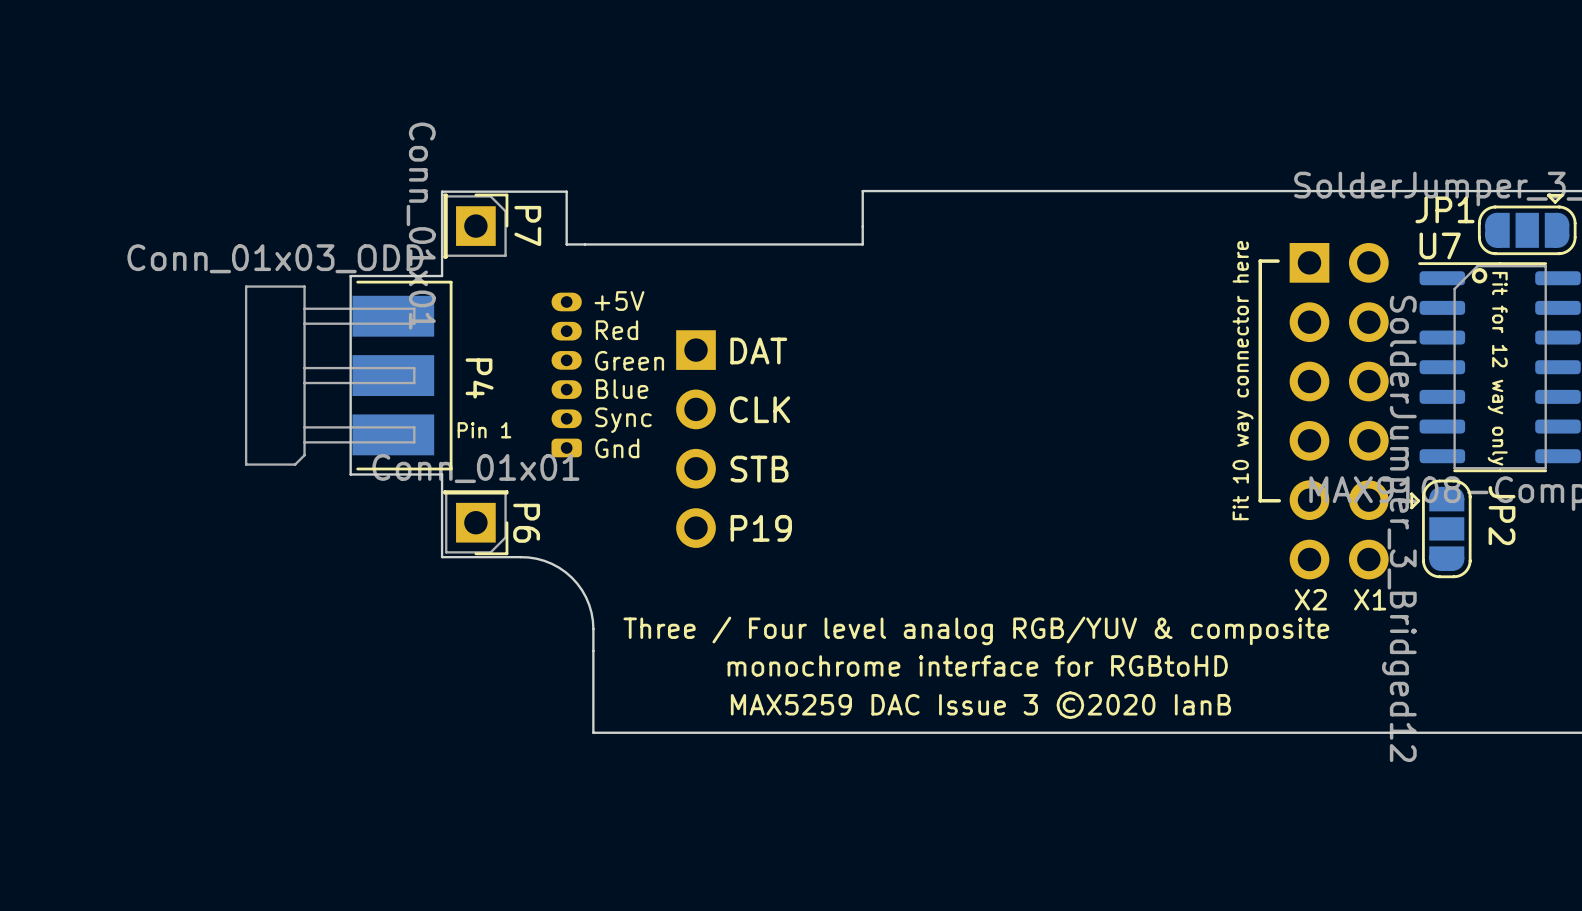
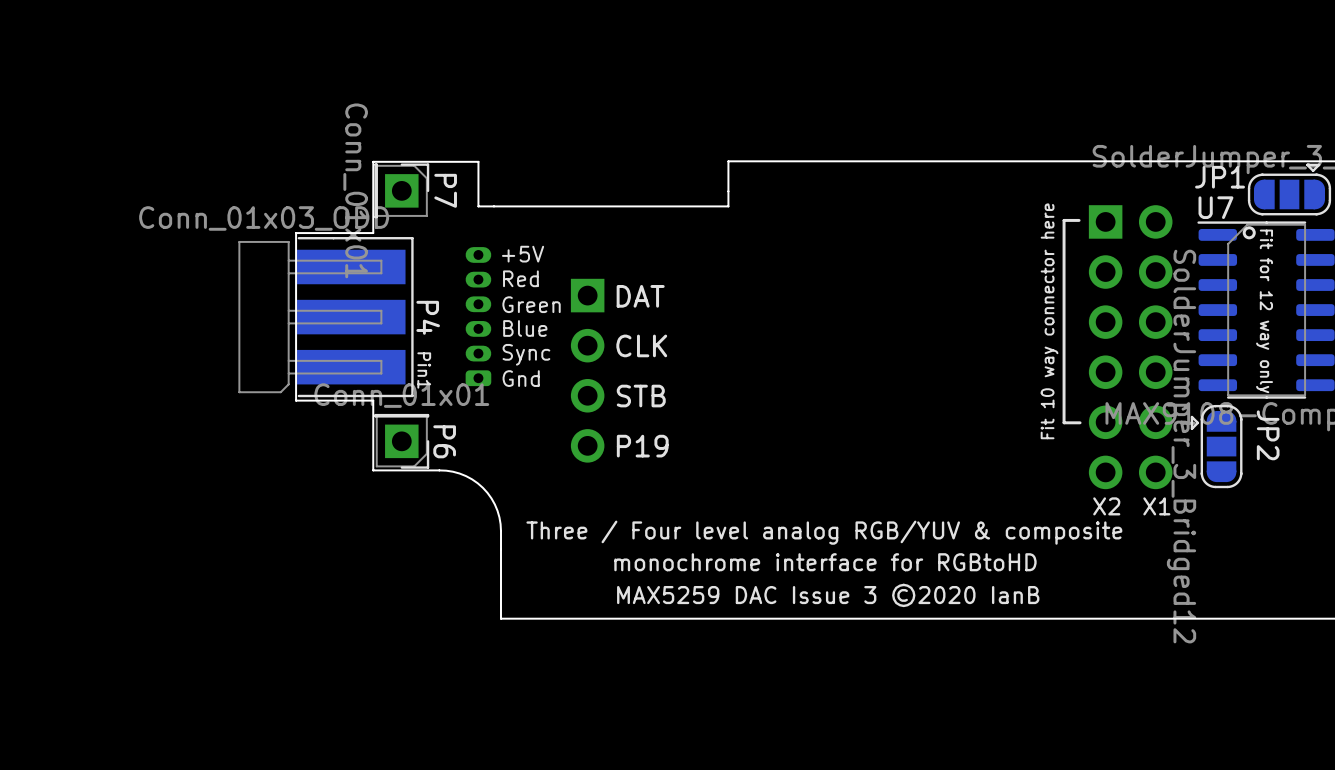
P4 footprint: [244, 280, 453, 471] -> [238, 237, 414, 398]
text: Pin 1 (484, 430) -> Pin1 (424, 370)

